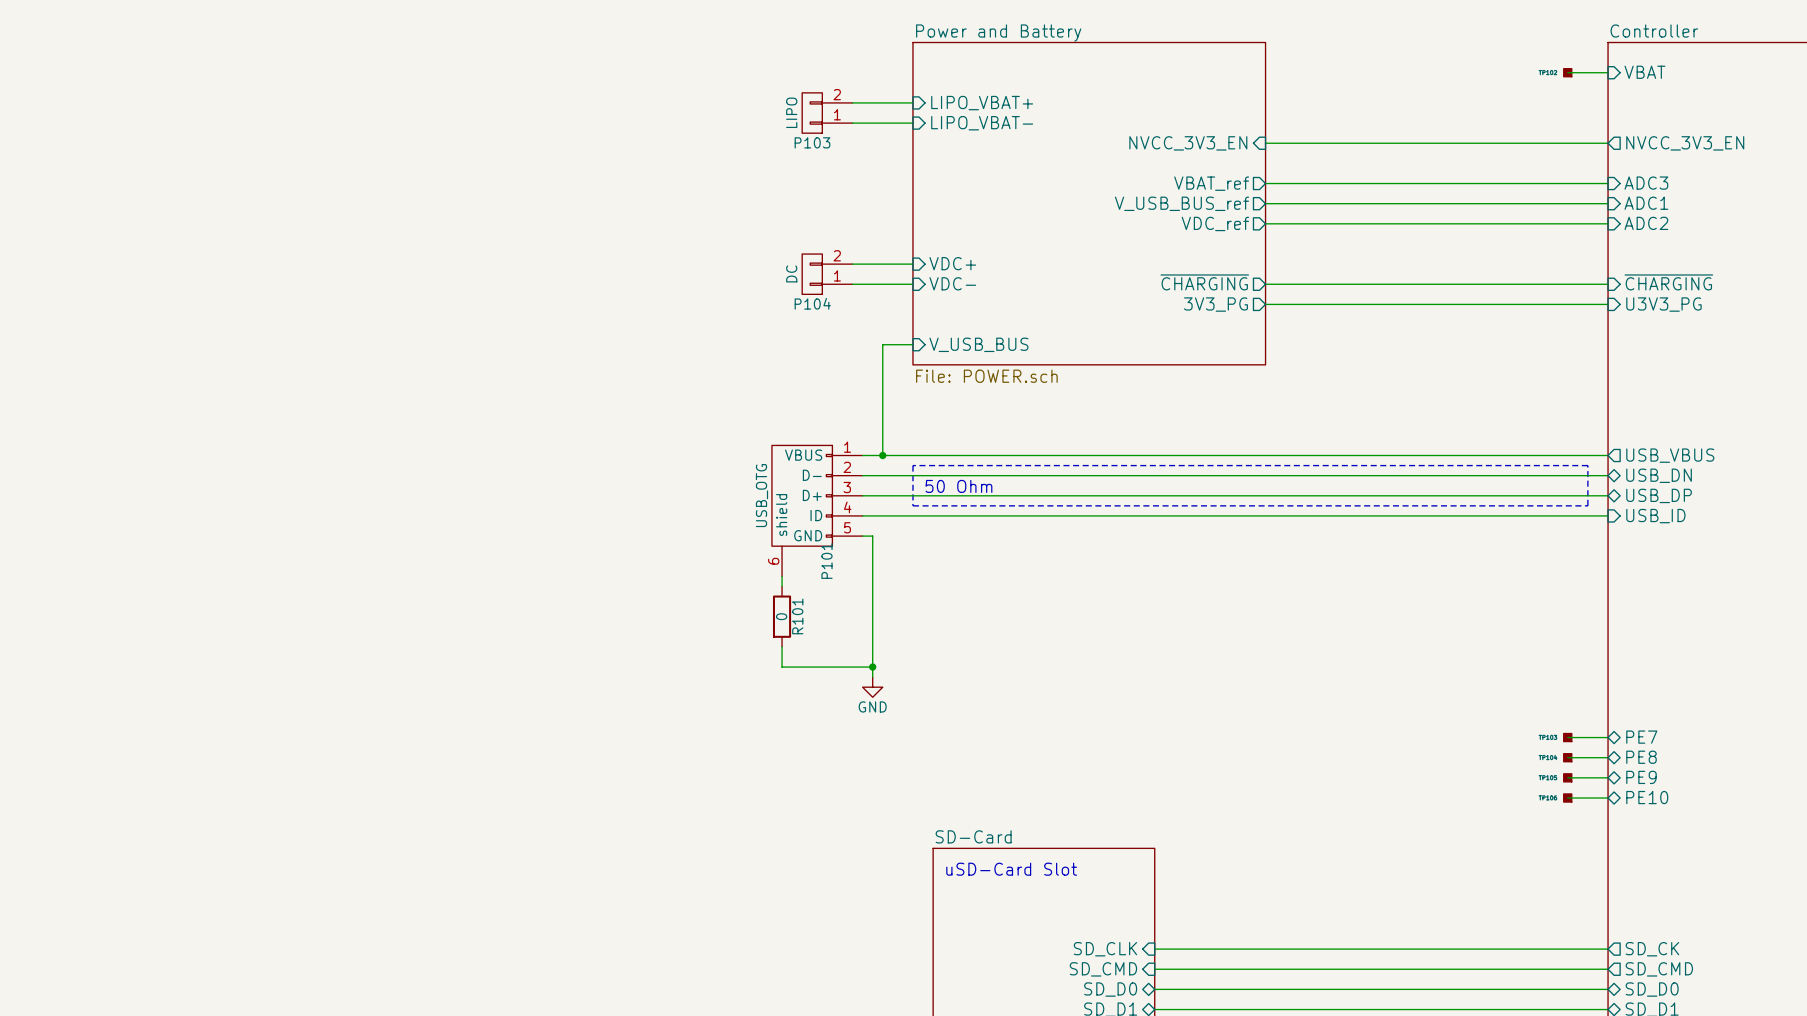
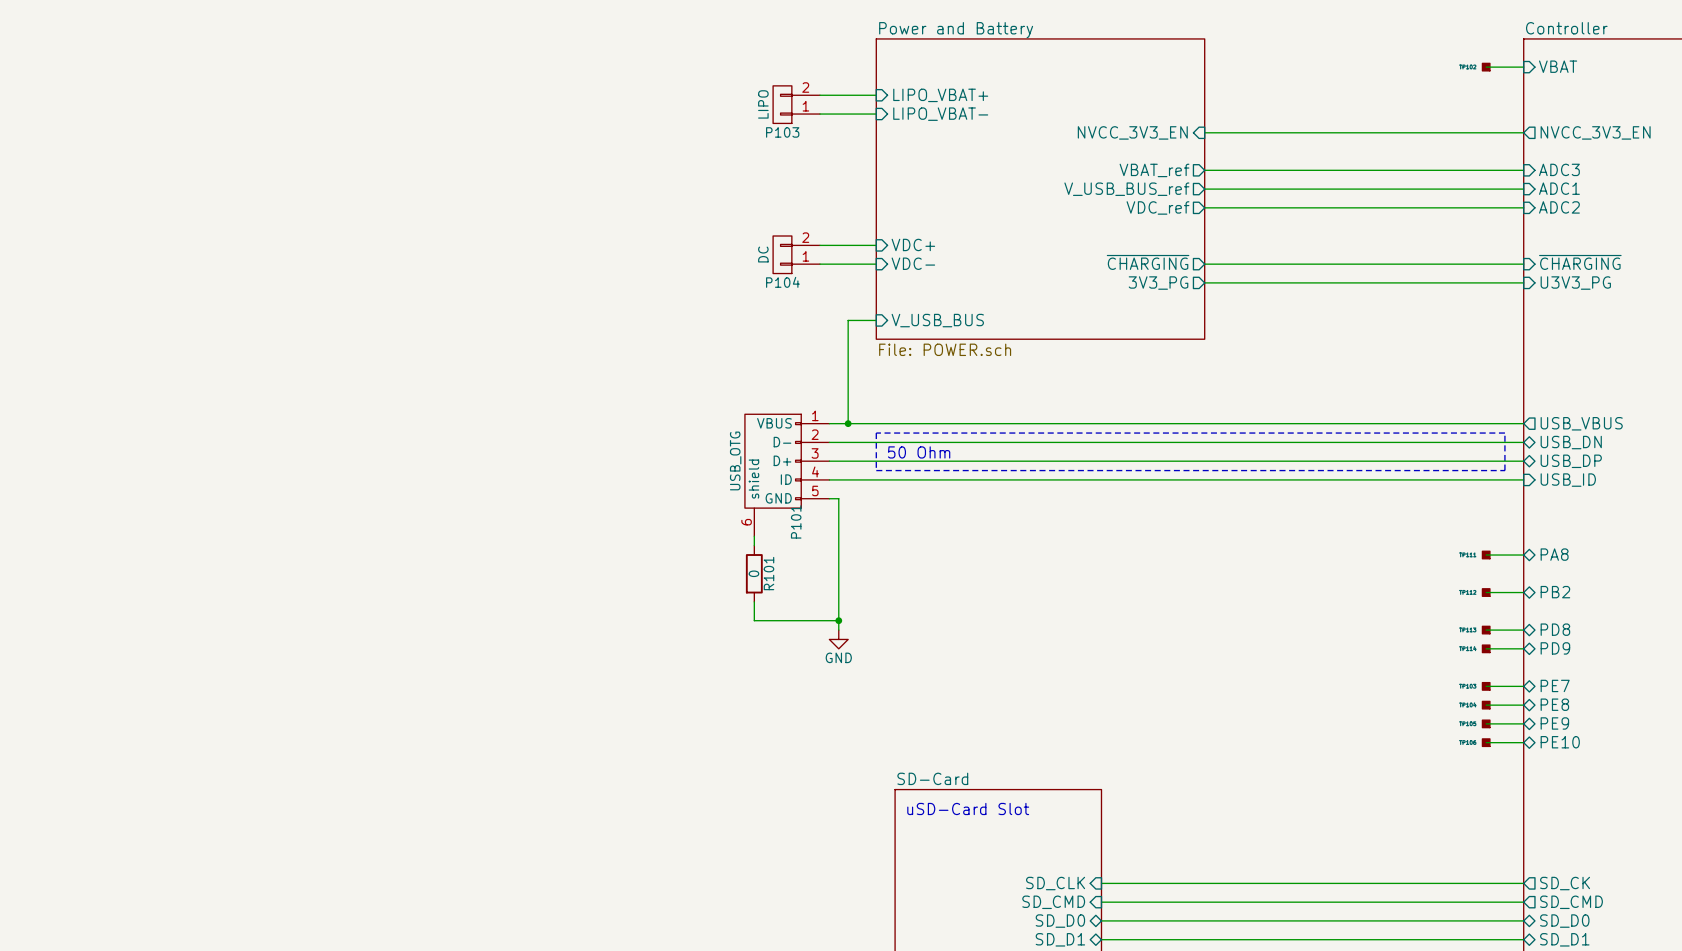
wire: none -> (1486, 555) (1523, 555)
part: none -> (1486, 555)
sheet pin: none -> PA8 (1554, 554)
wire: none -> (1486, 592) (1523, 592)
part: none -> (1486, 592)
sheet pin: none -> PB2 (1555, 592)
sheet pin: none -> PD8 (1555, 629)
wire: none -> (1486, 630) (1523, 630)
part: none -> (1486, 630)
sheet pin: none -> PD9 (1555, 648)
wire: none -> (1486, 648) (1523, 648)
part: none -> (1486, 648)

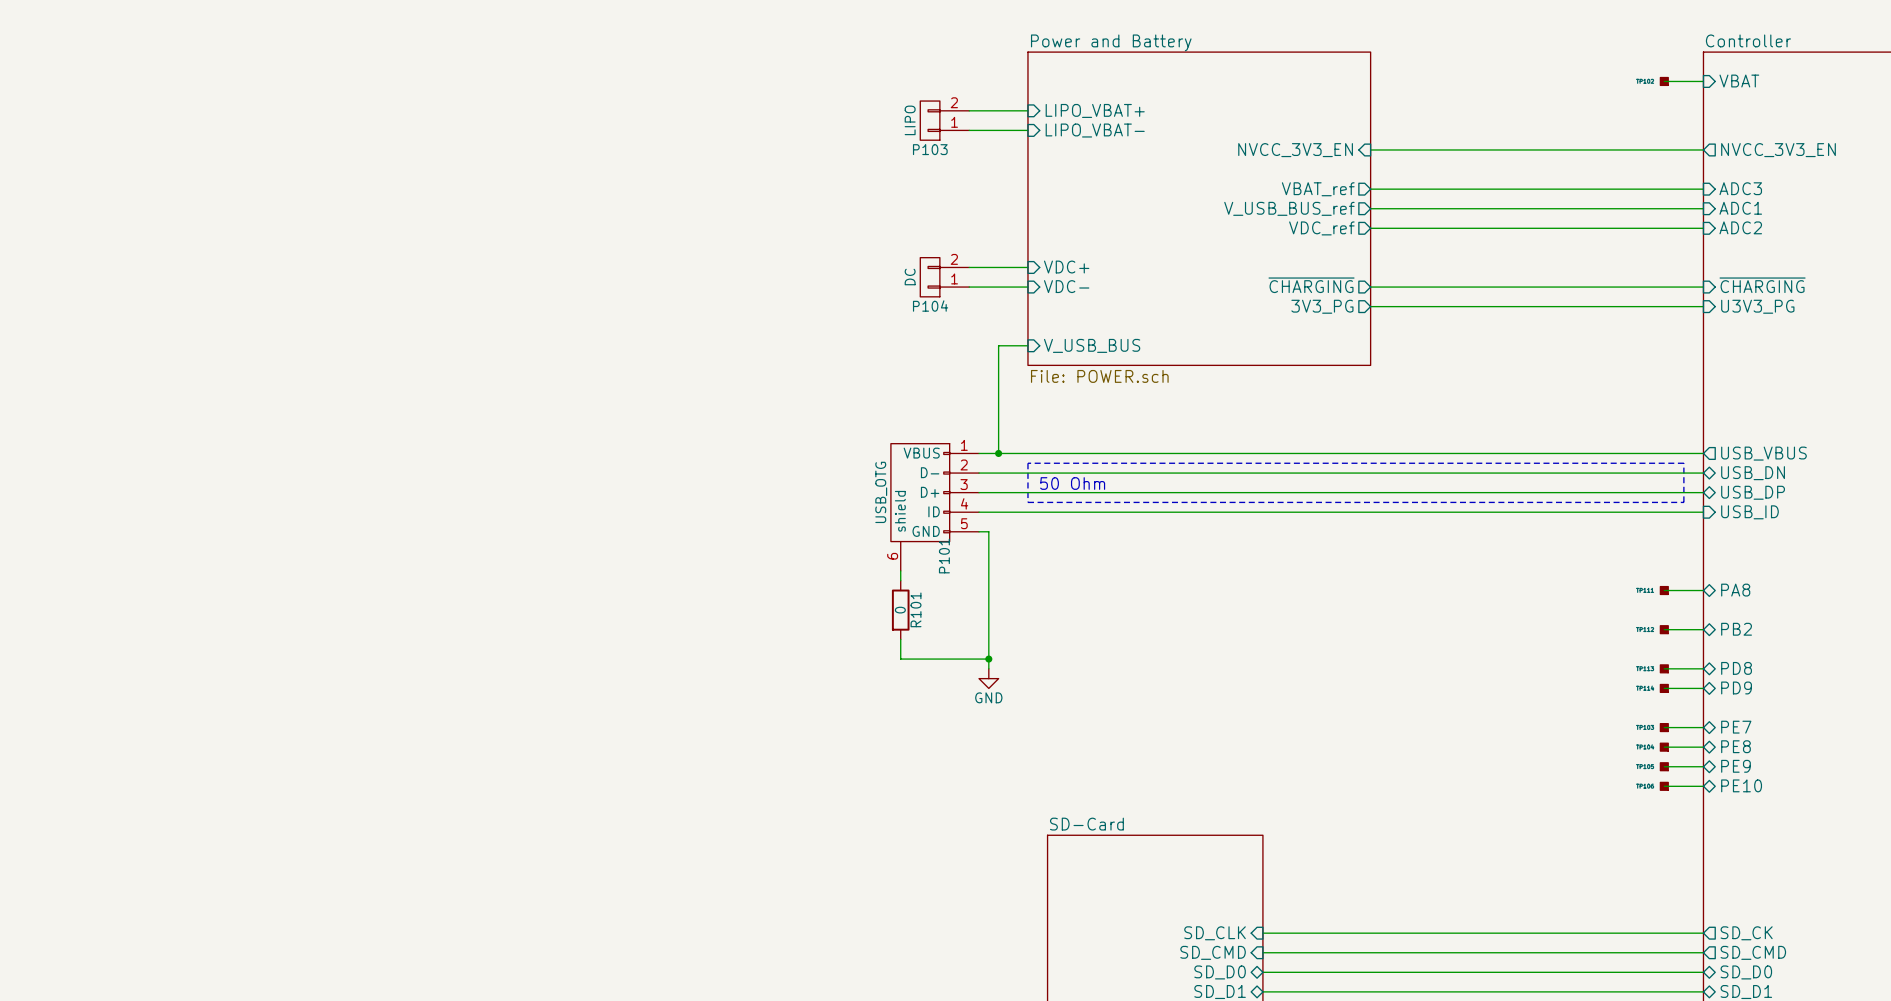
text: uSD-Card Slot (968, 808) -> none

